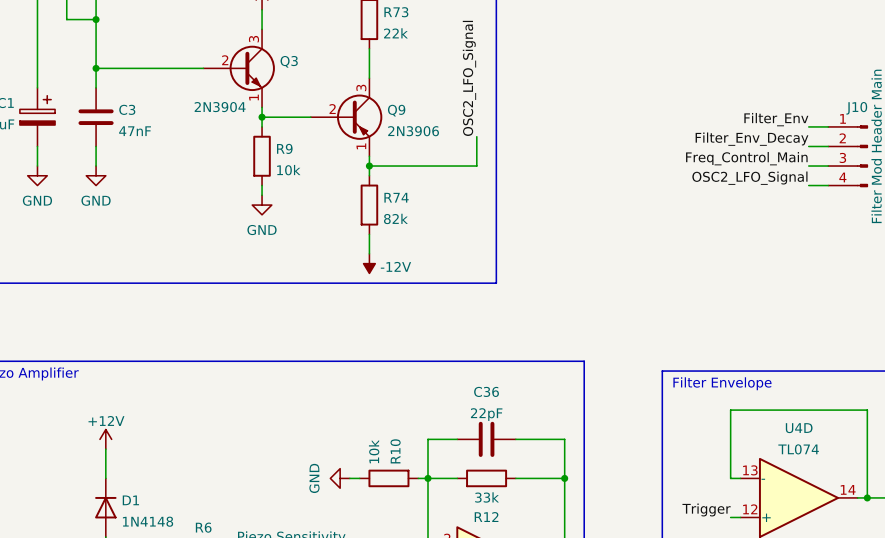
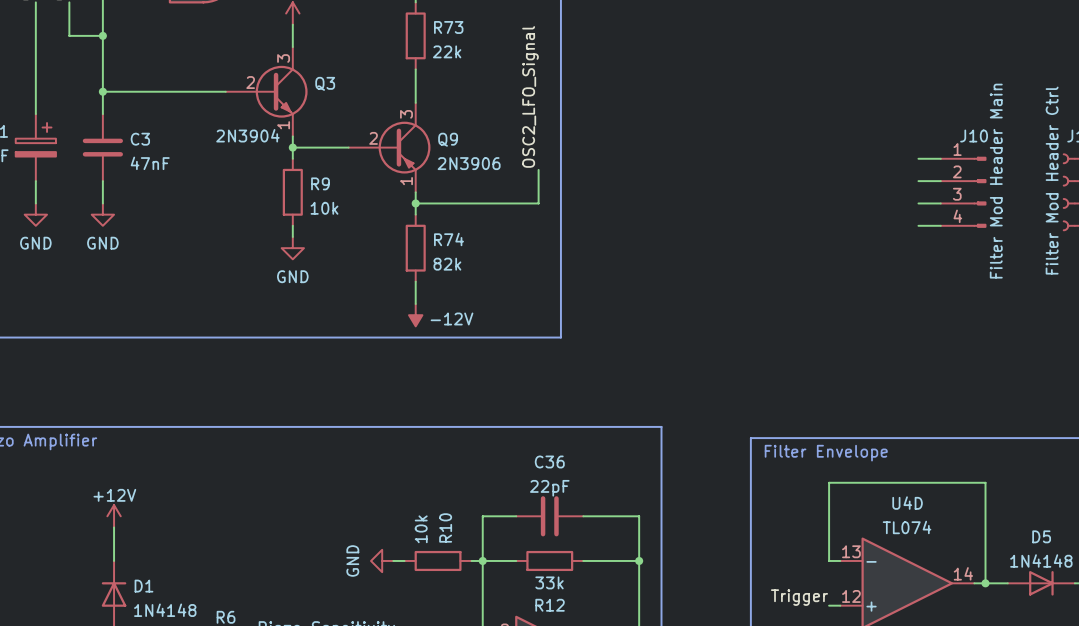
label: Filter_Env (776, 119) -> none
label: Filter_Env_Decay (751, 139) -> none
label: Freq_Control_Main (746, 158) -> none
label: OSC2_LFO_Signal (749, 178) -> none

